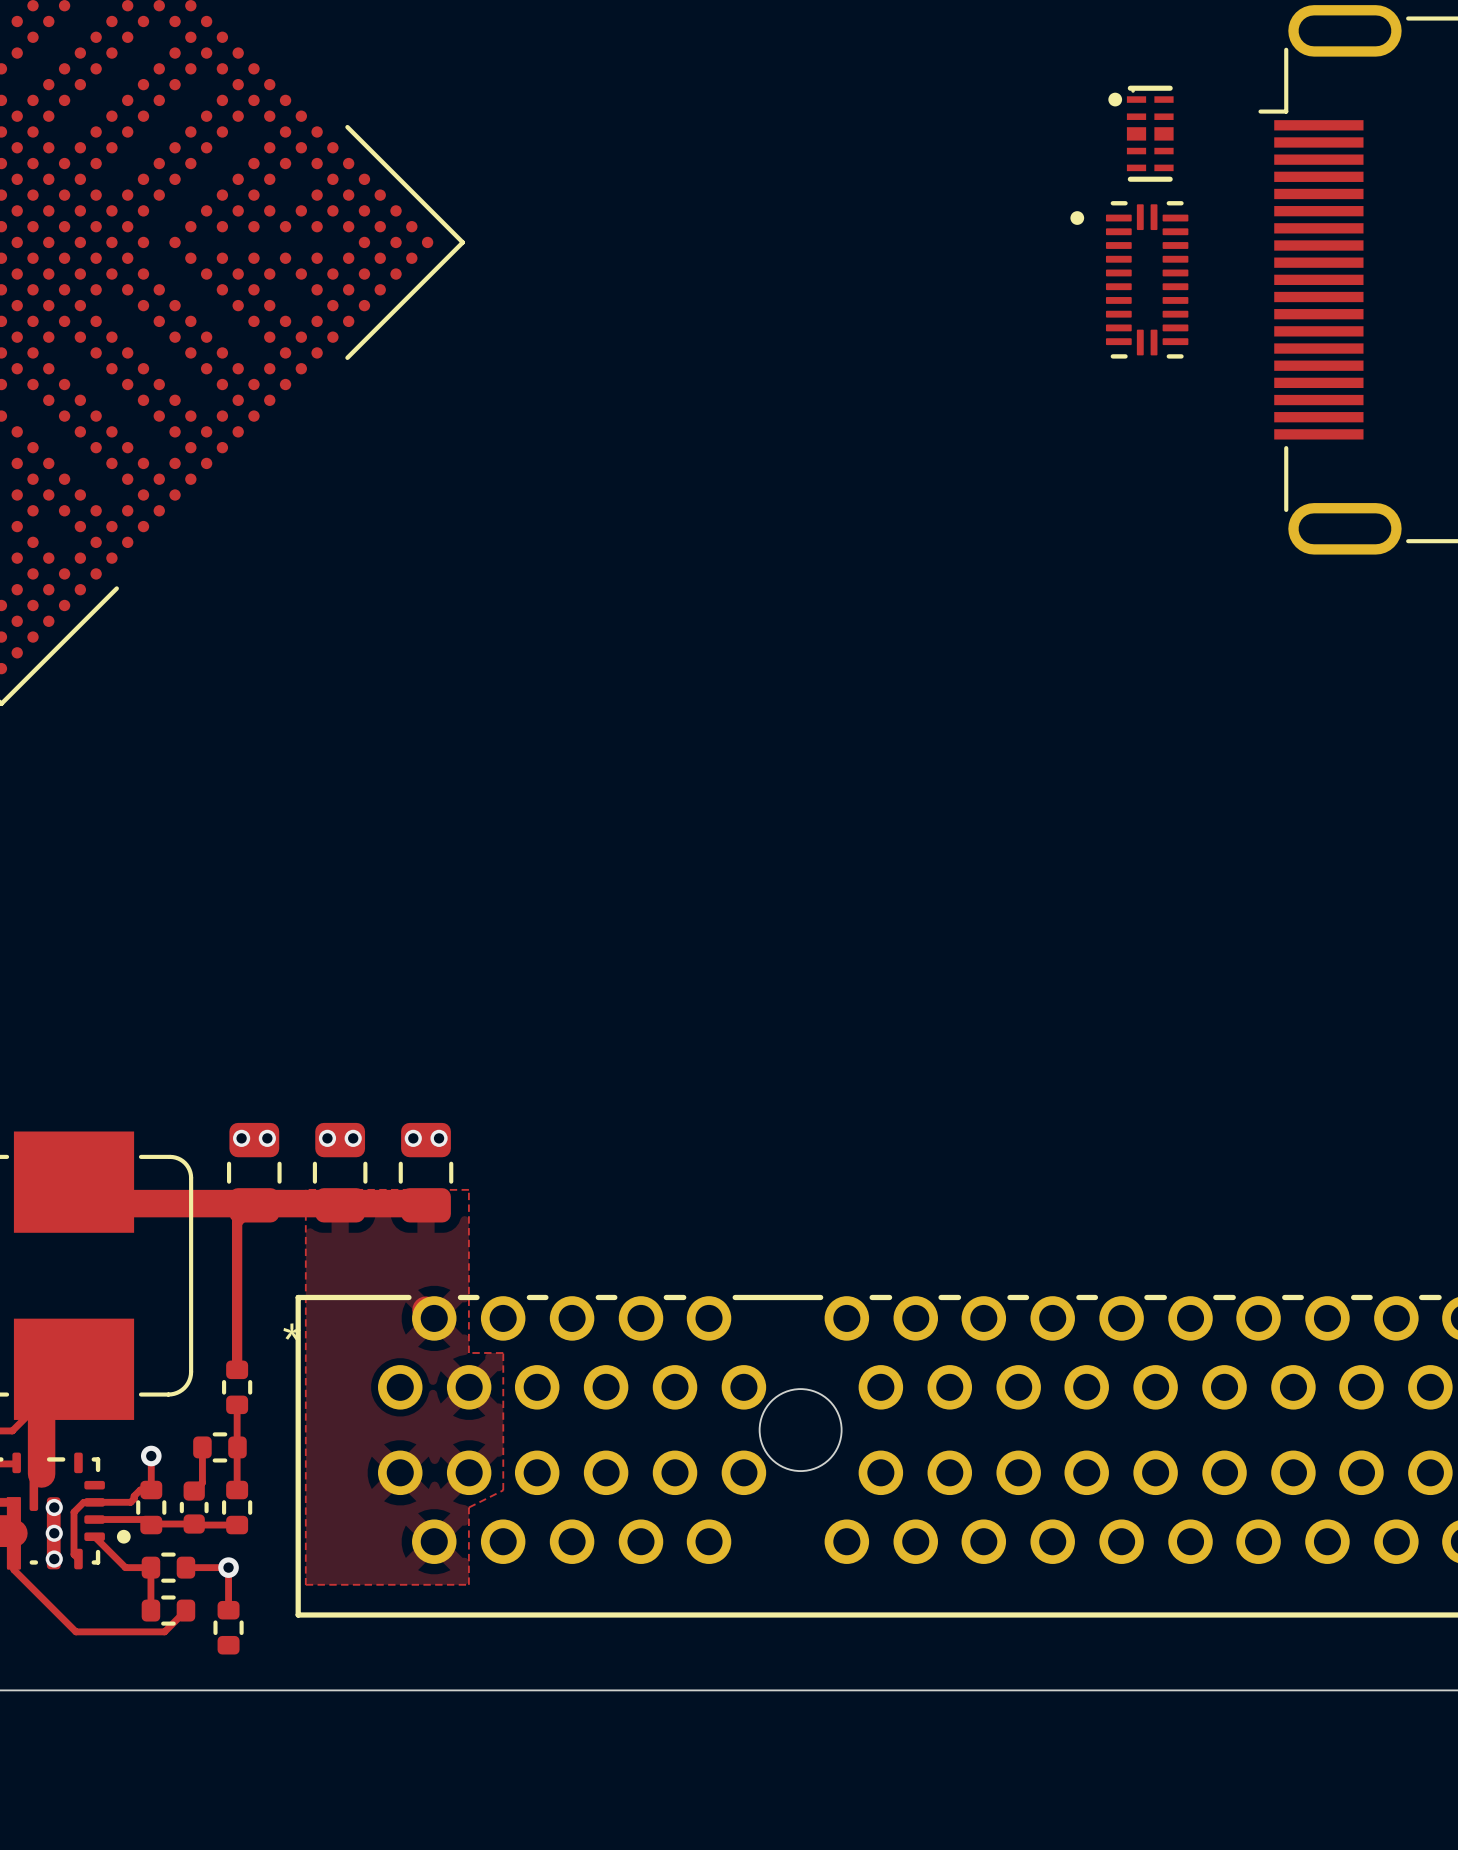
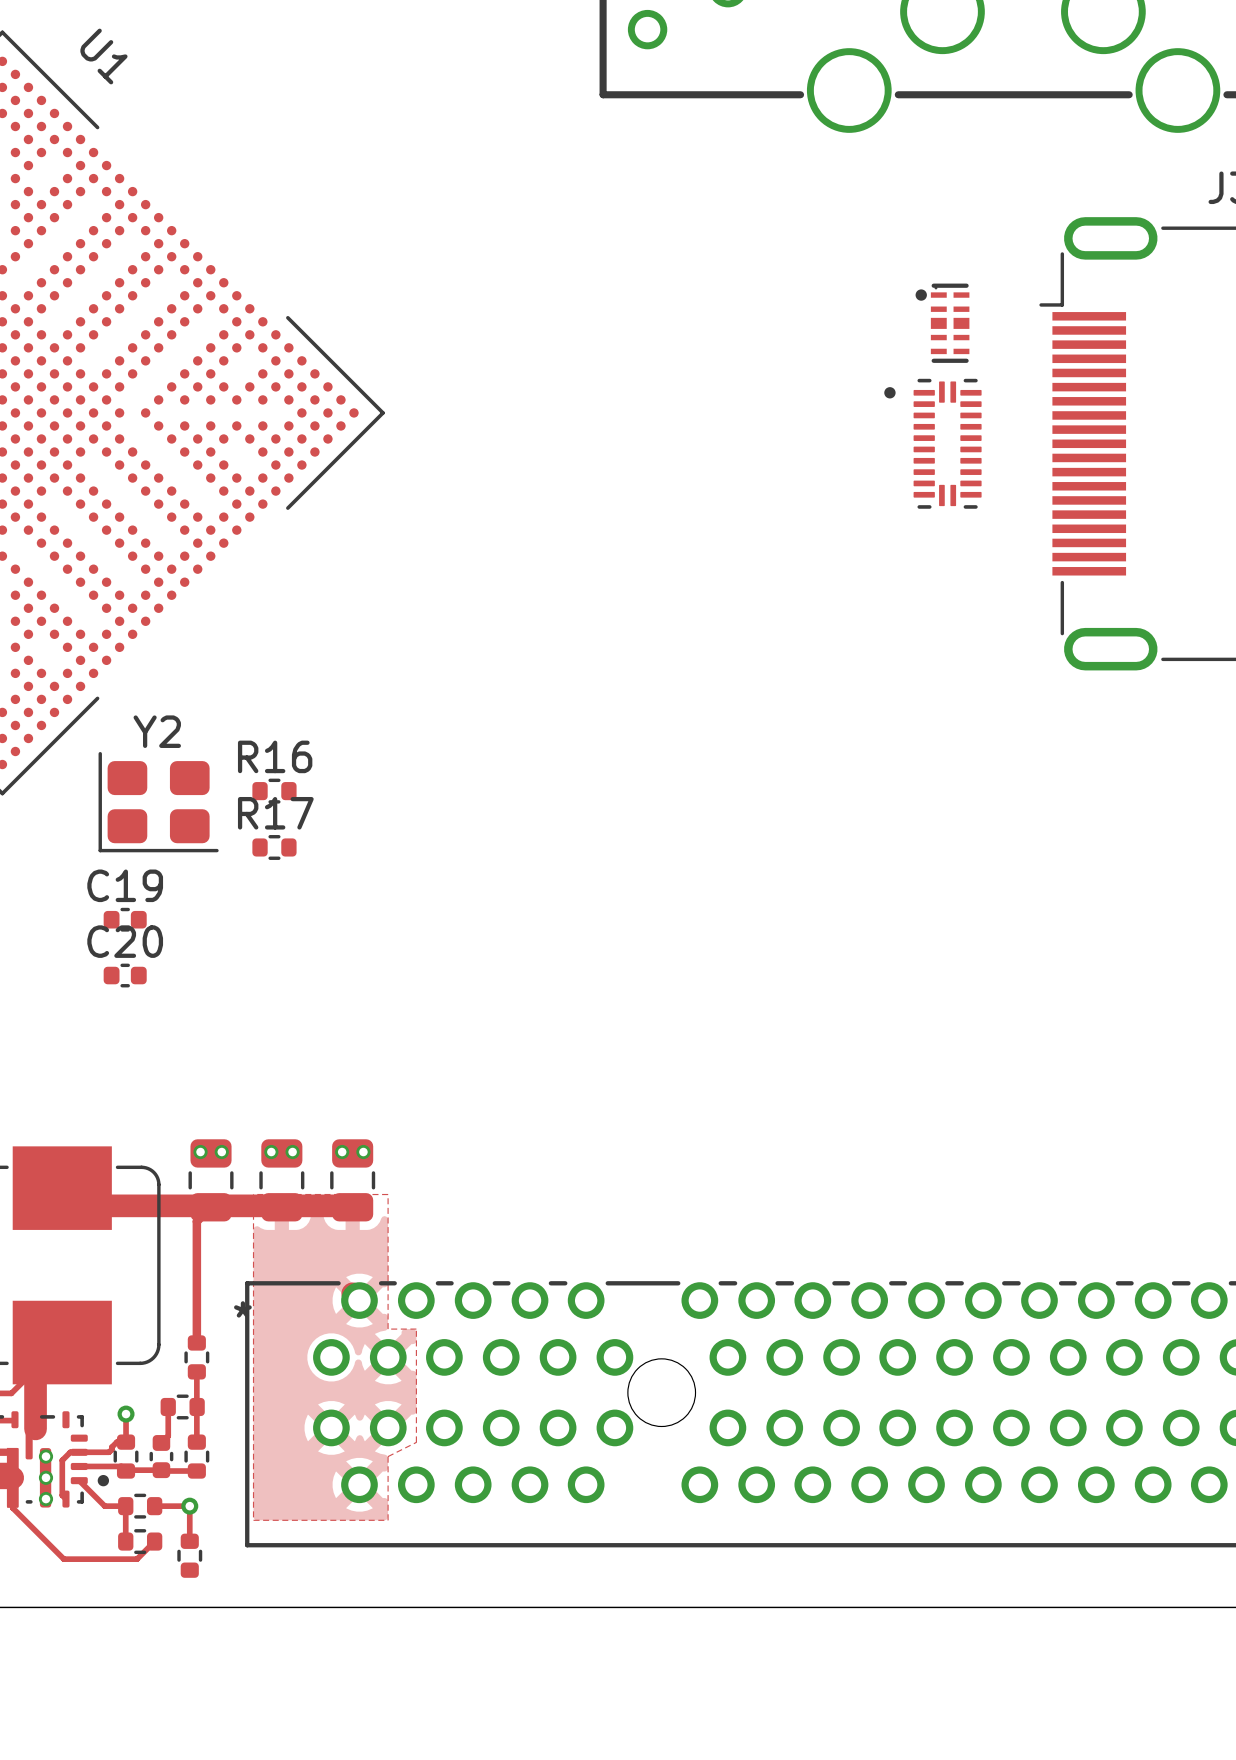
R16: none -> (274, 791)
Y2: none -> (158, 802)
R17: none -> (274, 847)
C19: none -> (125, 919)
C20: none -> (125, 975)

